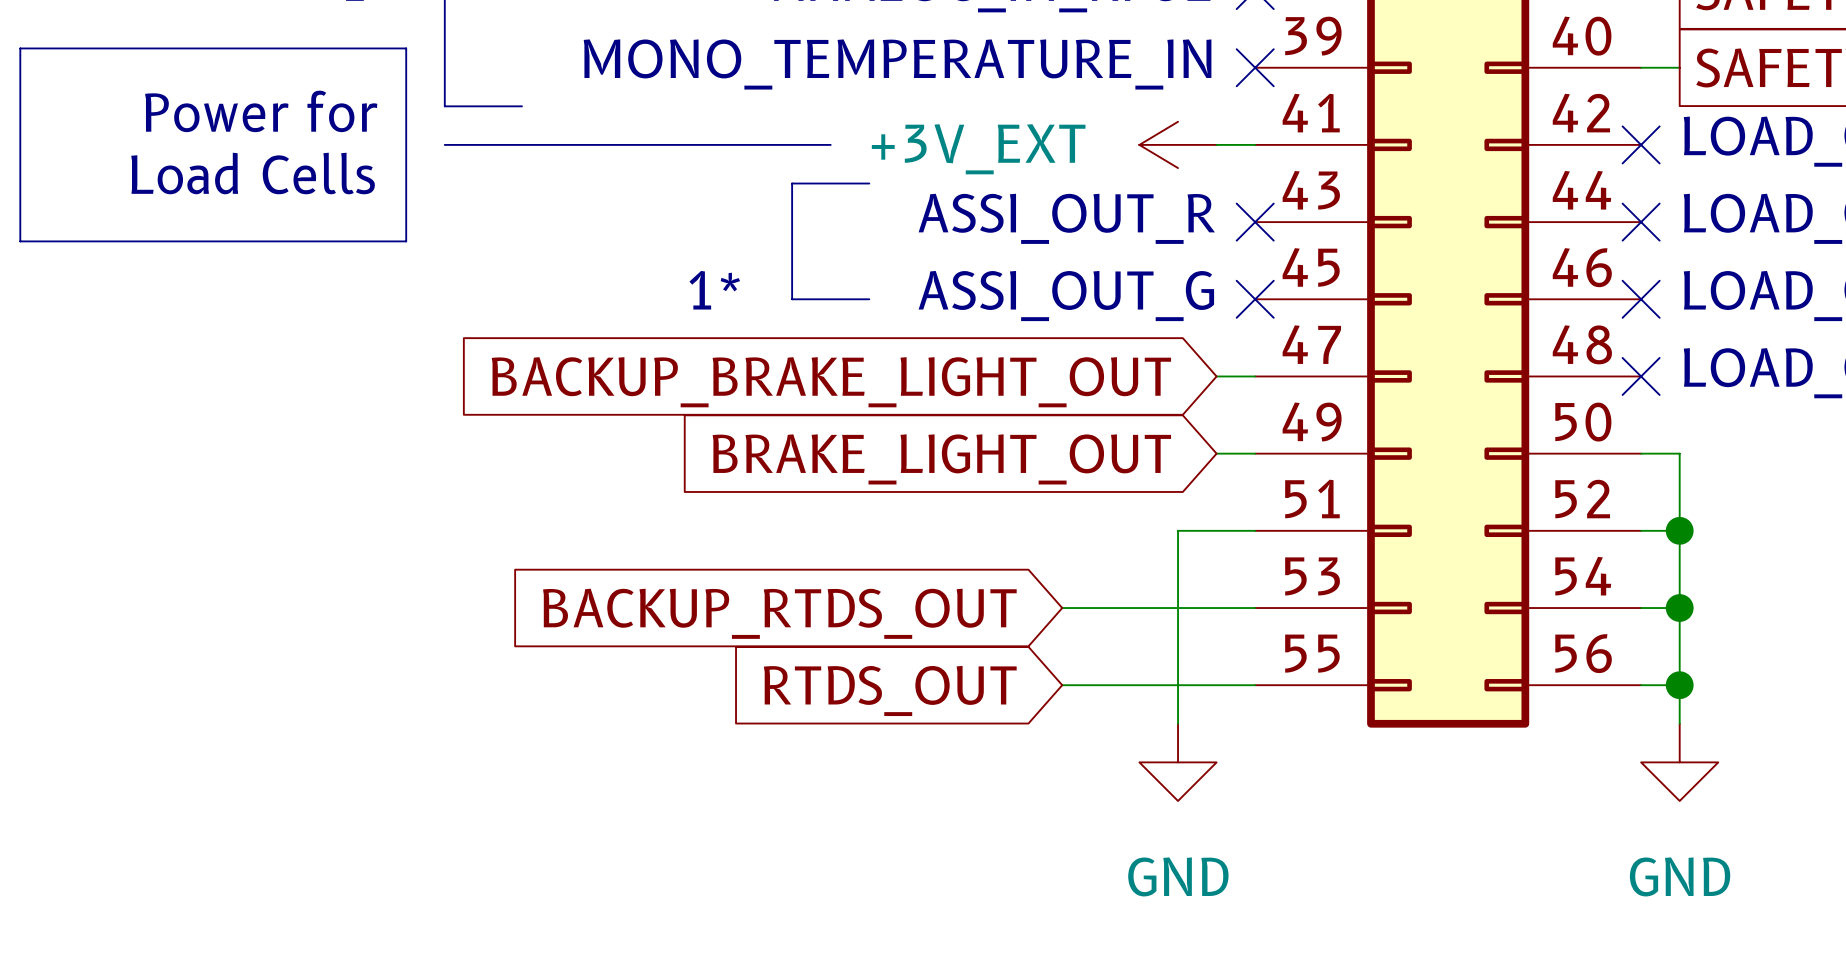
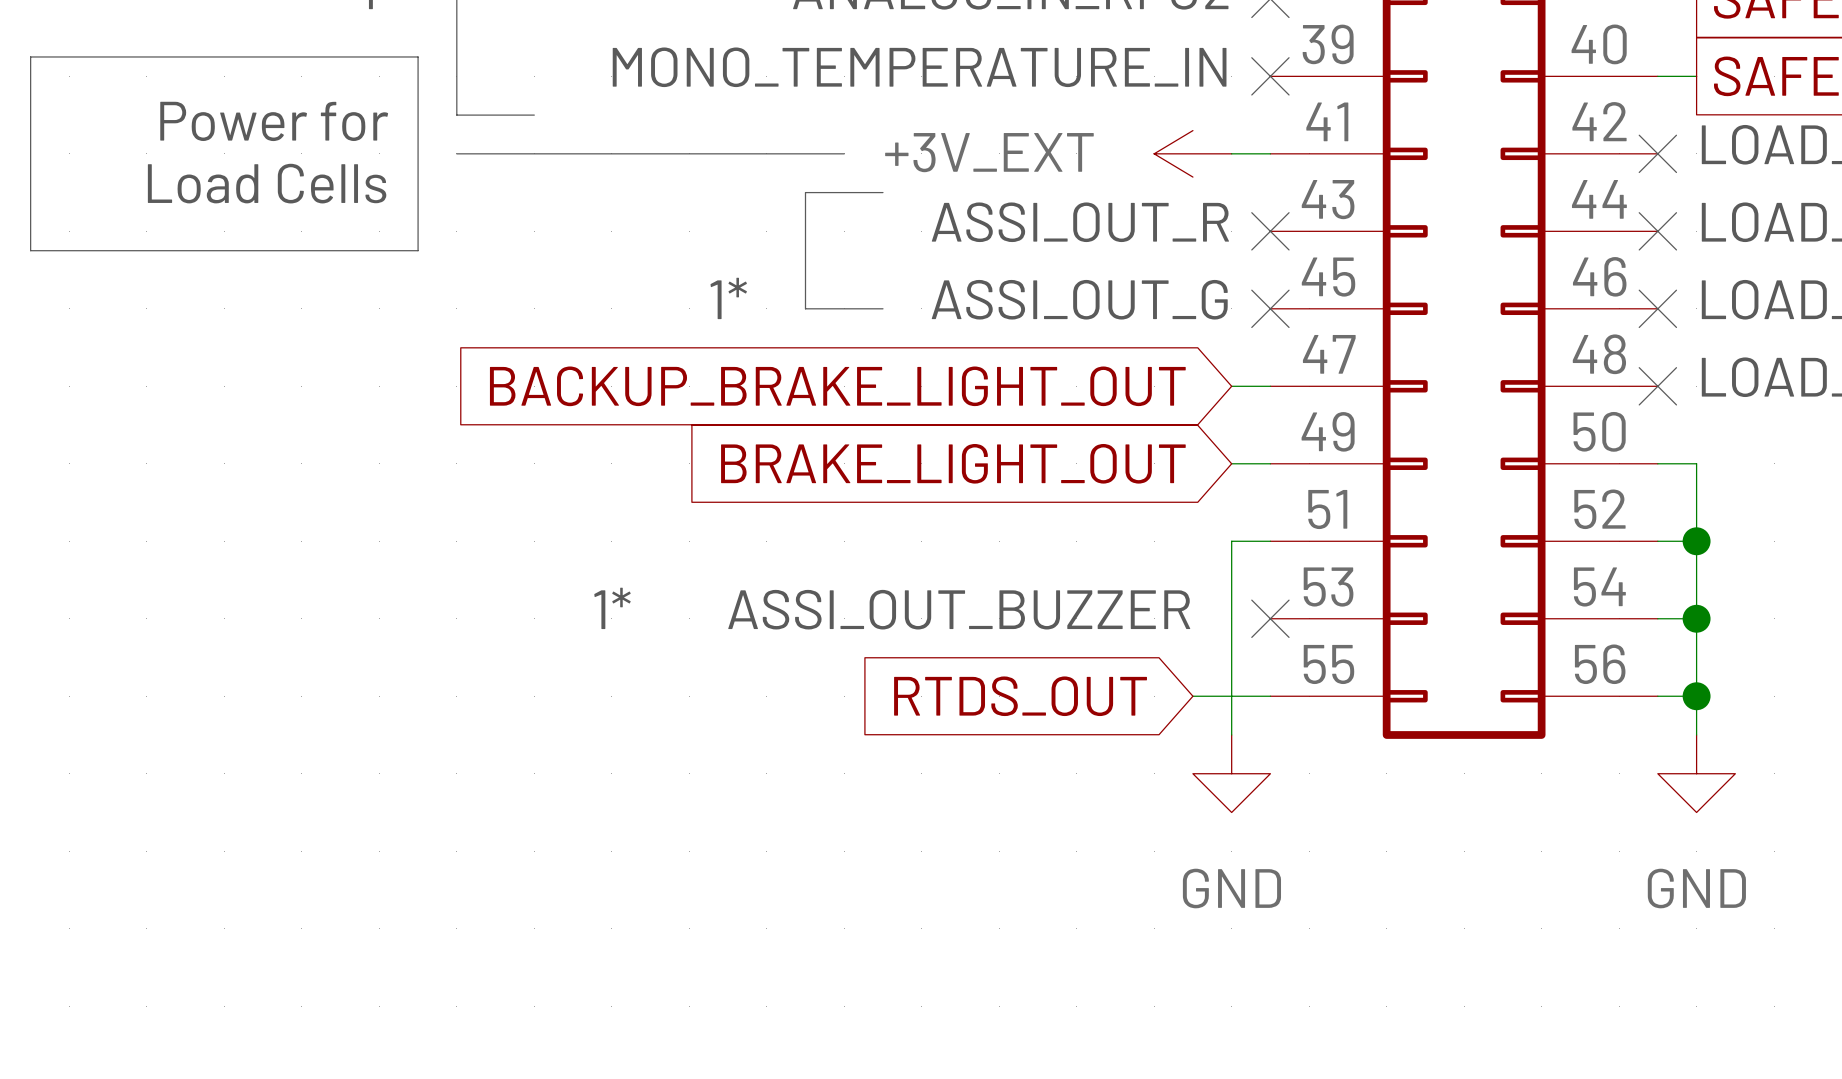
wire: (1216, 530) (1178, 530) (1178, 723) -> (1231, 541) (1231, 734)
text: none -> 1* (612, 608)
text: none -> ASSI_OUT_BUZZER (959, 609)
wire: (1062, 608) (1255, 608) -> none
no-connect mark: none -> (1270, 618)
global label: BACKUP_RTDS_OUT (779, 613) -> none
wire: (1062, 685) (1178, 685) -> none
global label position: RTDS_OUT (890, 690) -> RTDS_OUT (1020, 696)
power symbol position: GND (1178, 762) -> GND (1231, 773)

